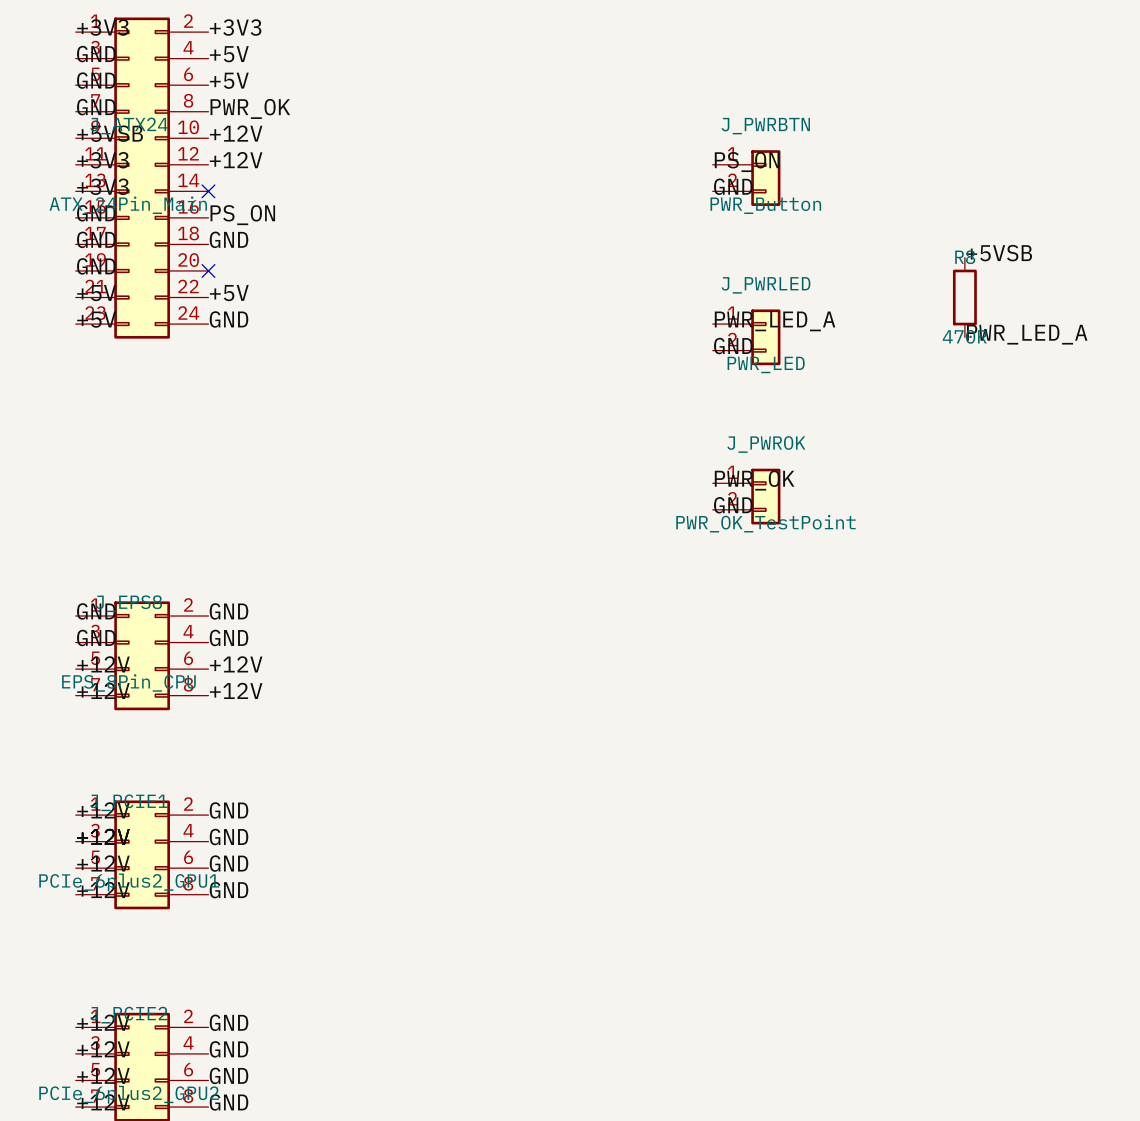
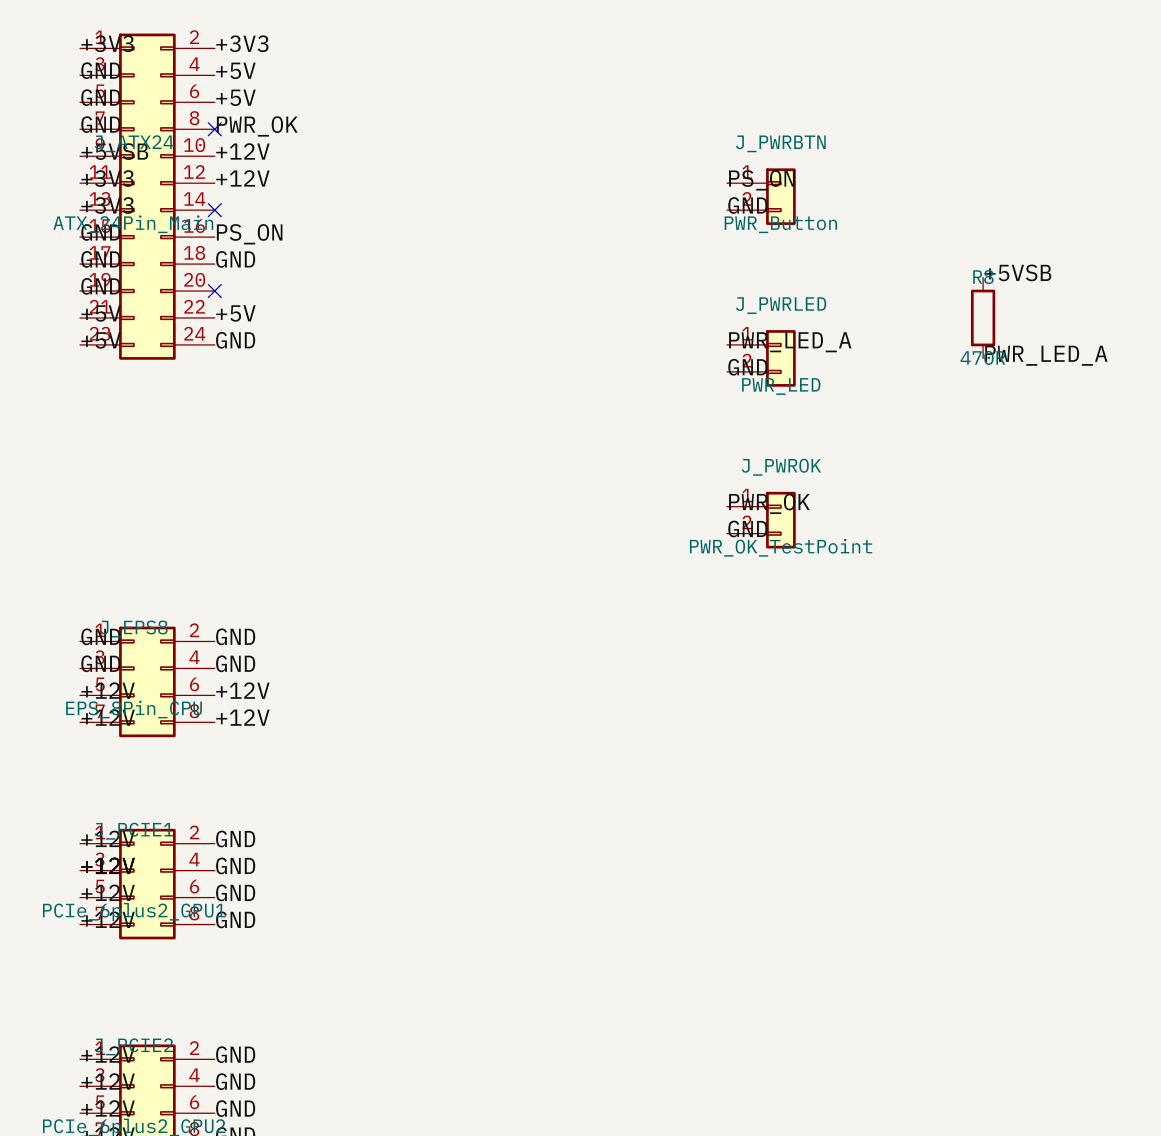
no-connect mark: none -> (214, 129)

